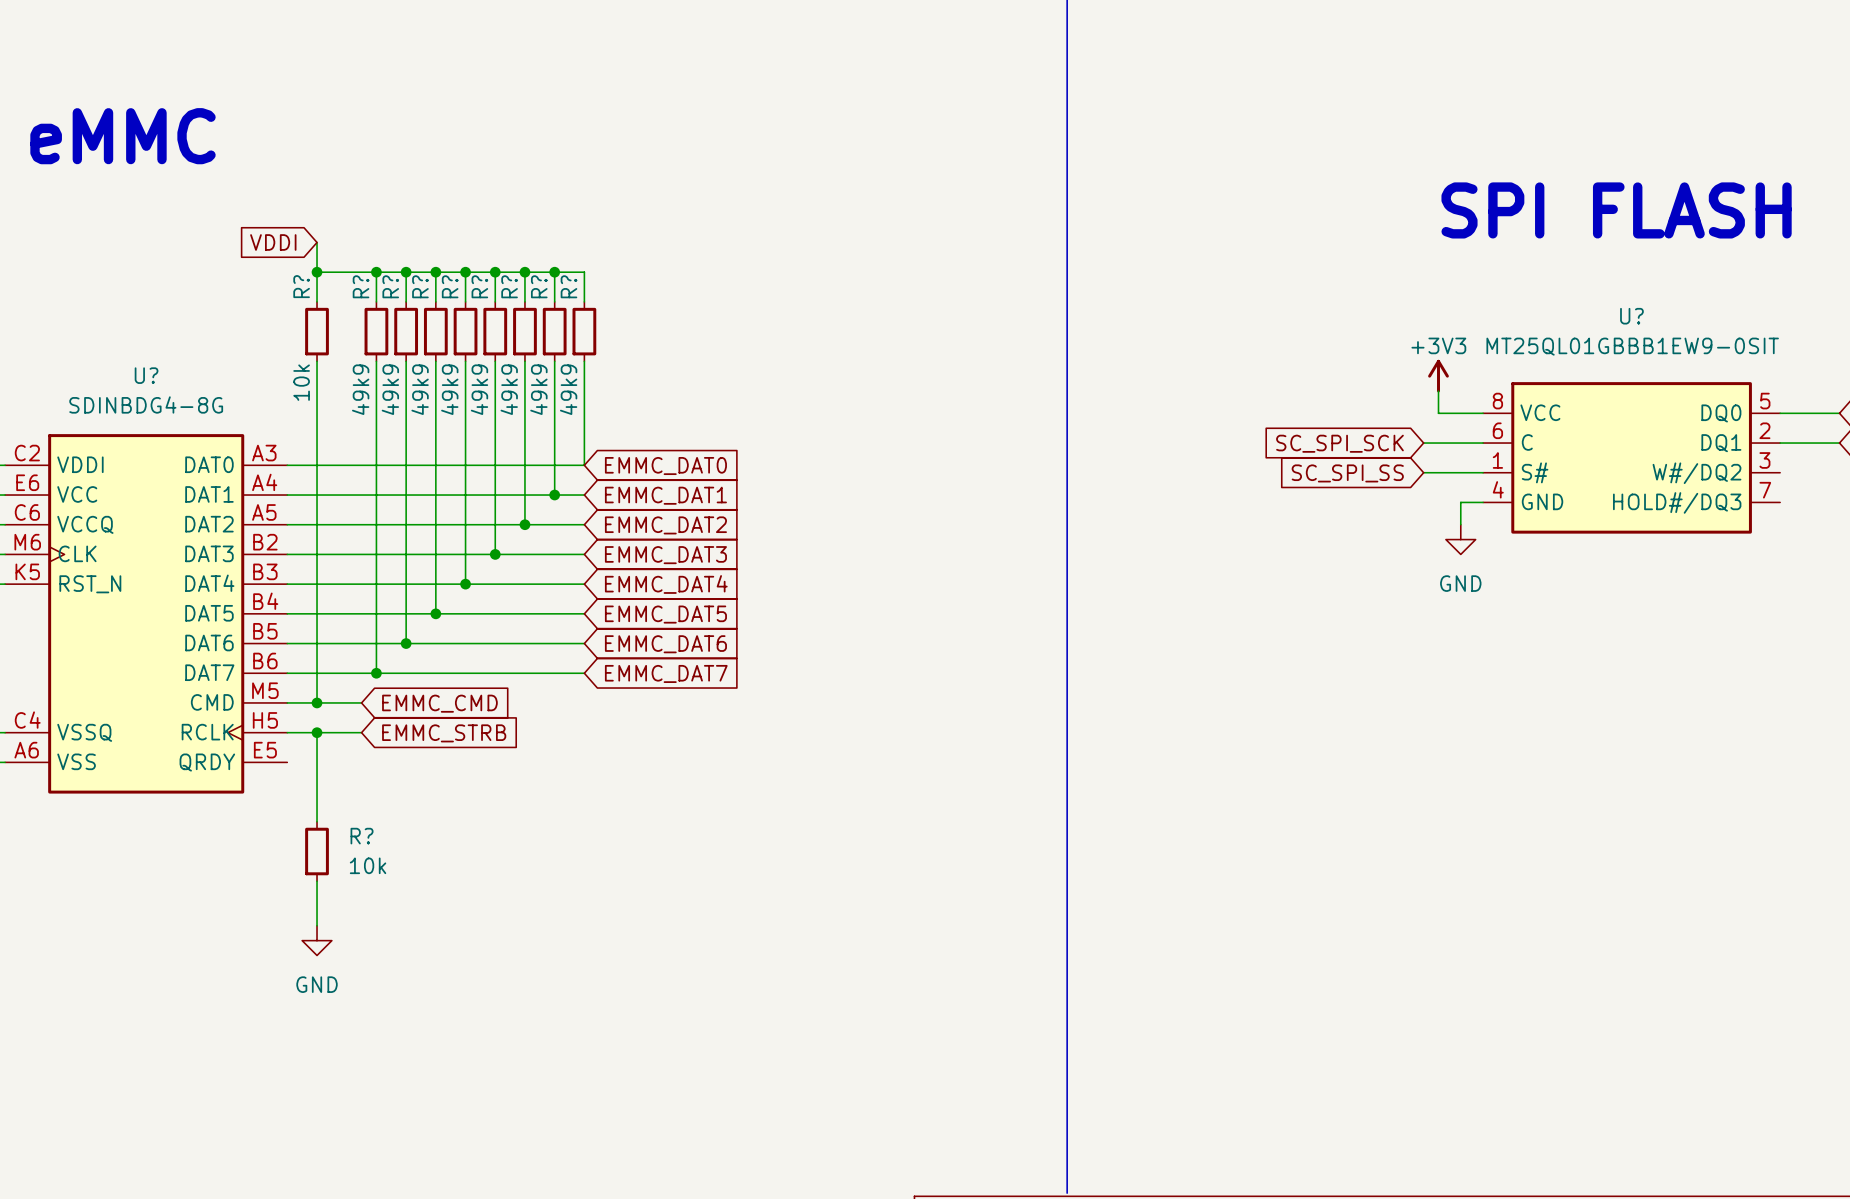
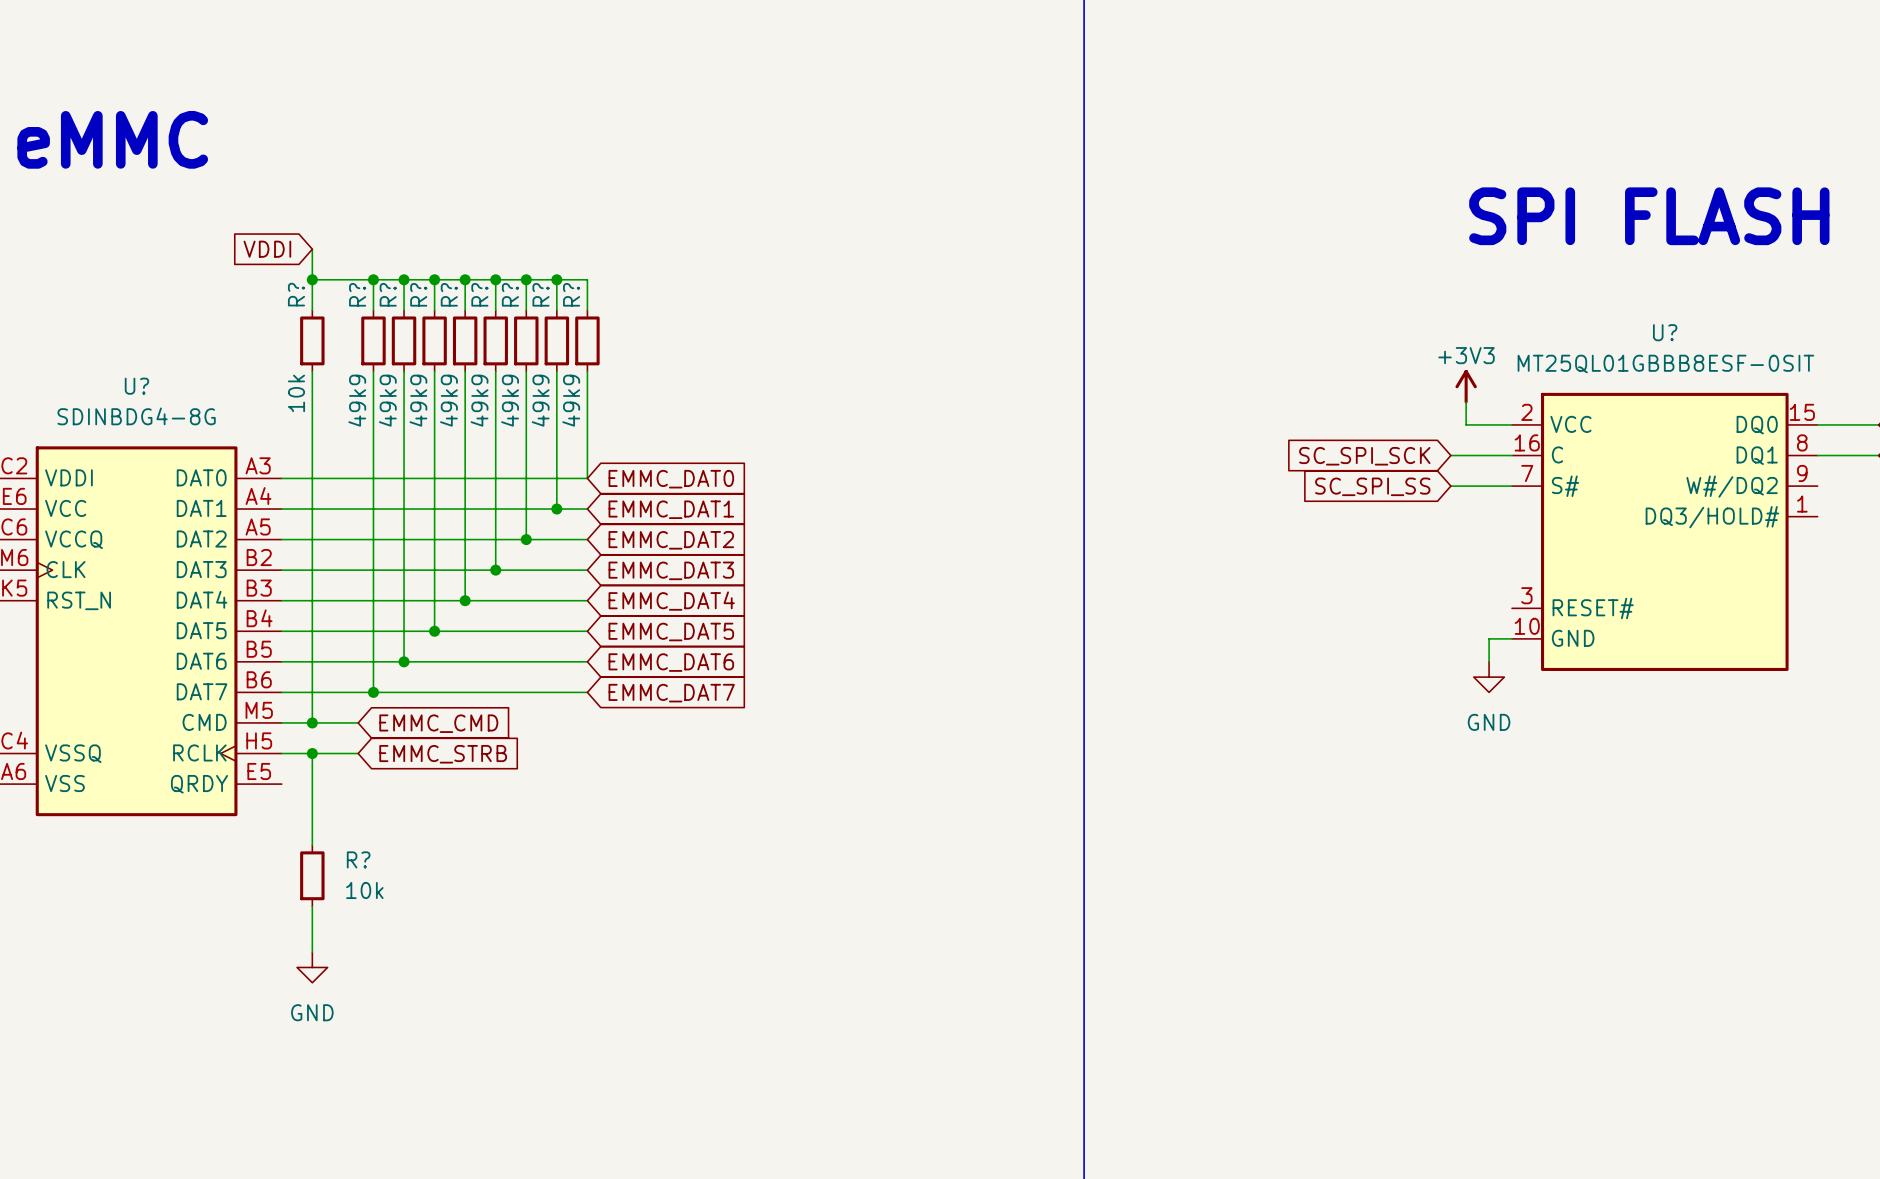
U?: (1631, 457) -> none
wire: (1483, 502) (1460, 502) (1460, 524) -> (1511, 638) (1489, 638) (1489, 661)
U?: none -> (1664, 531)
power symbol position: GND (1460, 539) -> GND (1489, 677)

